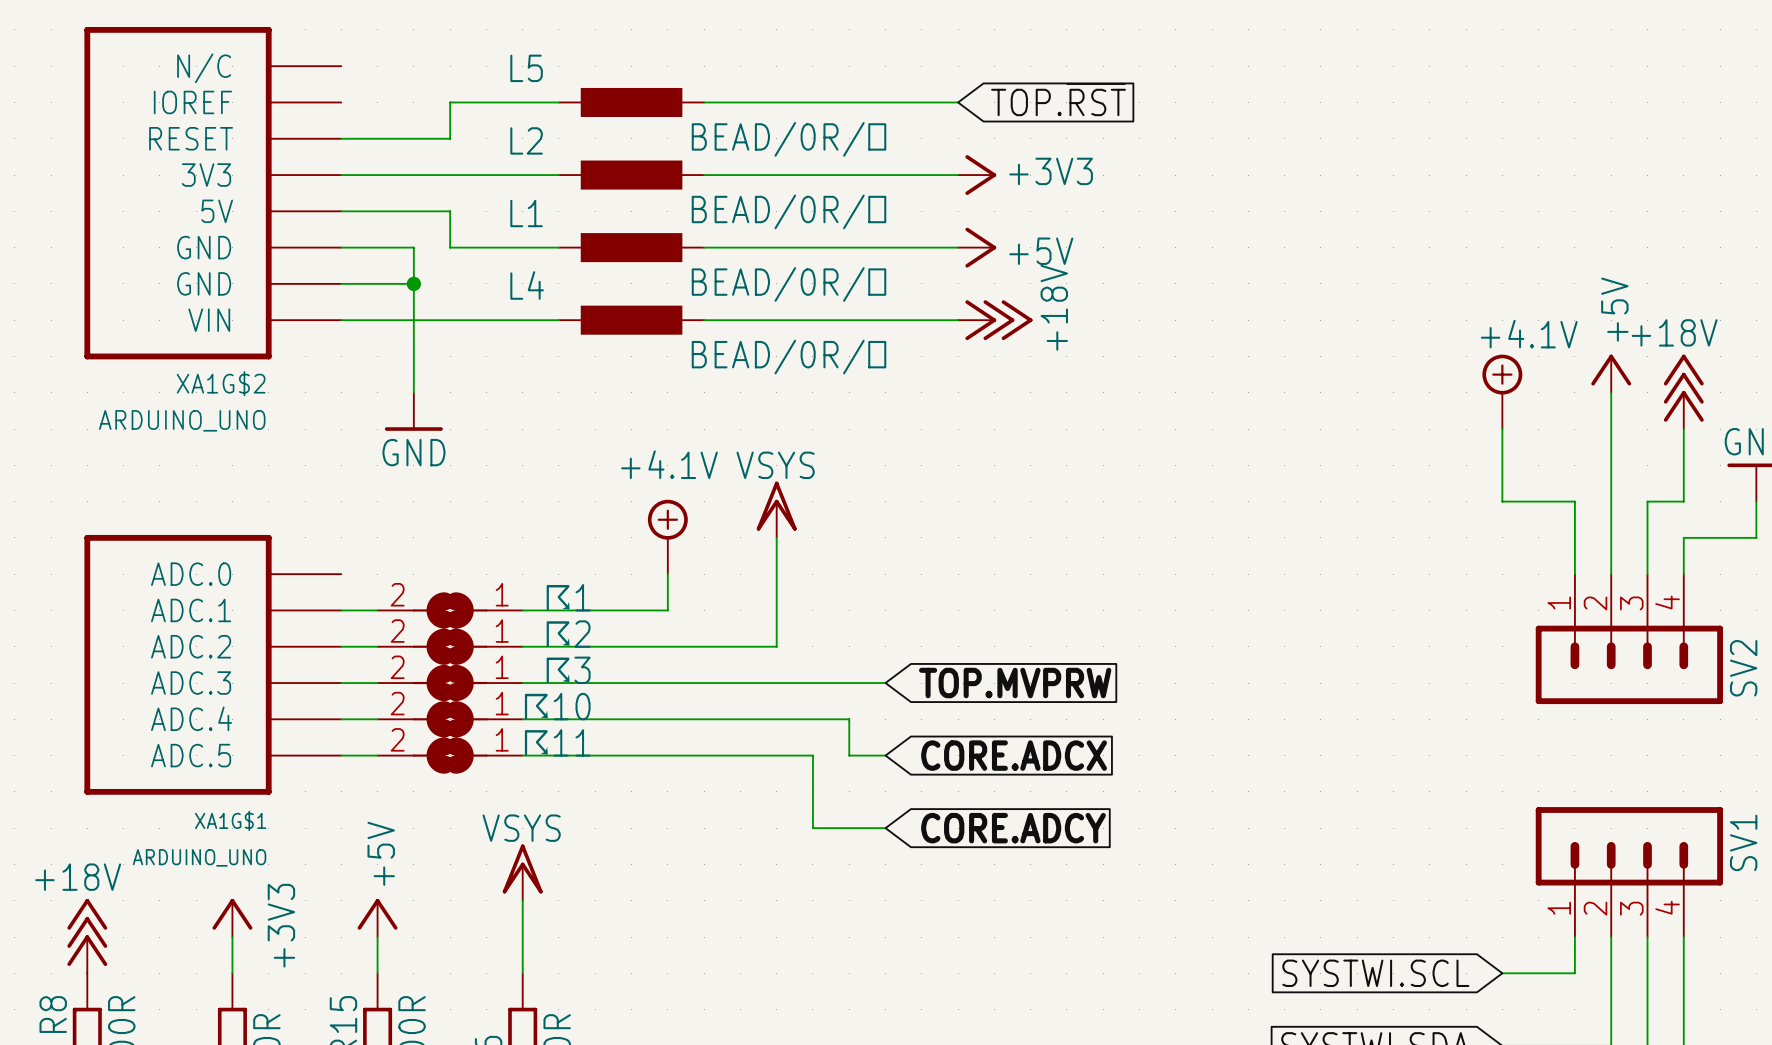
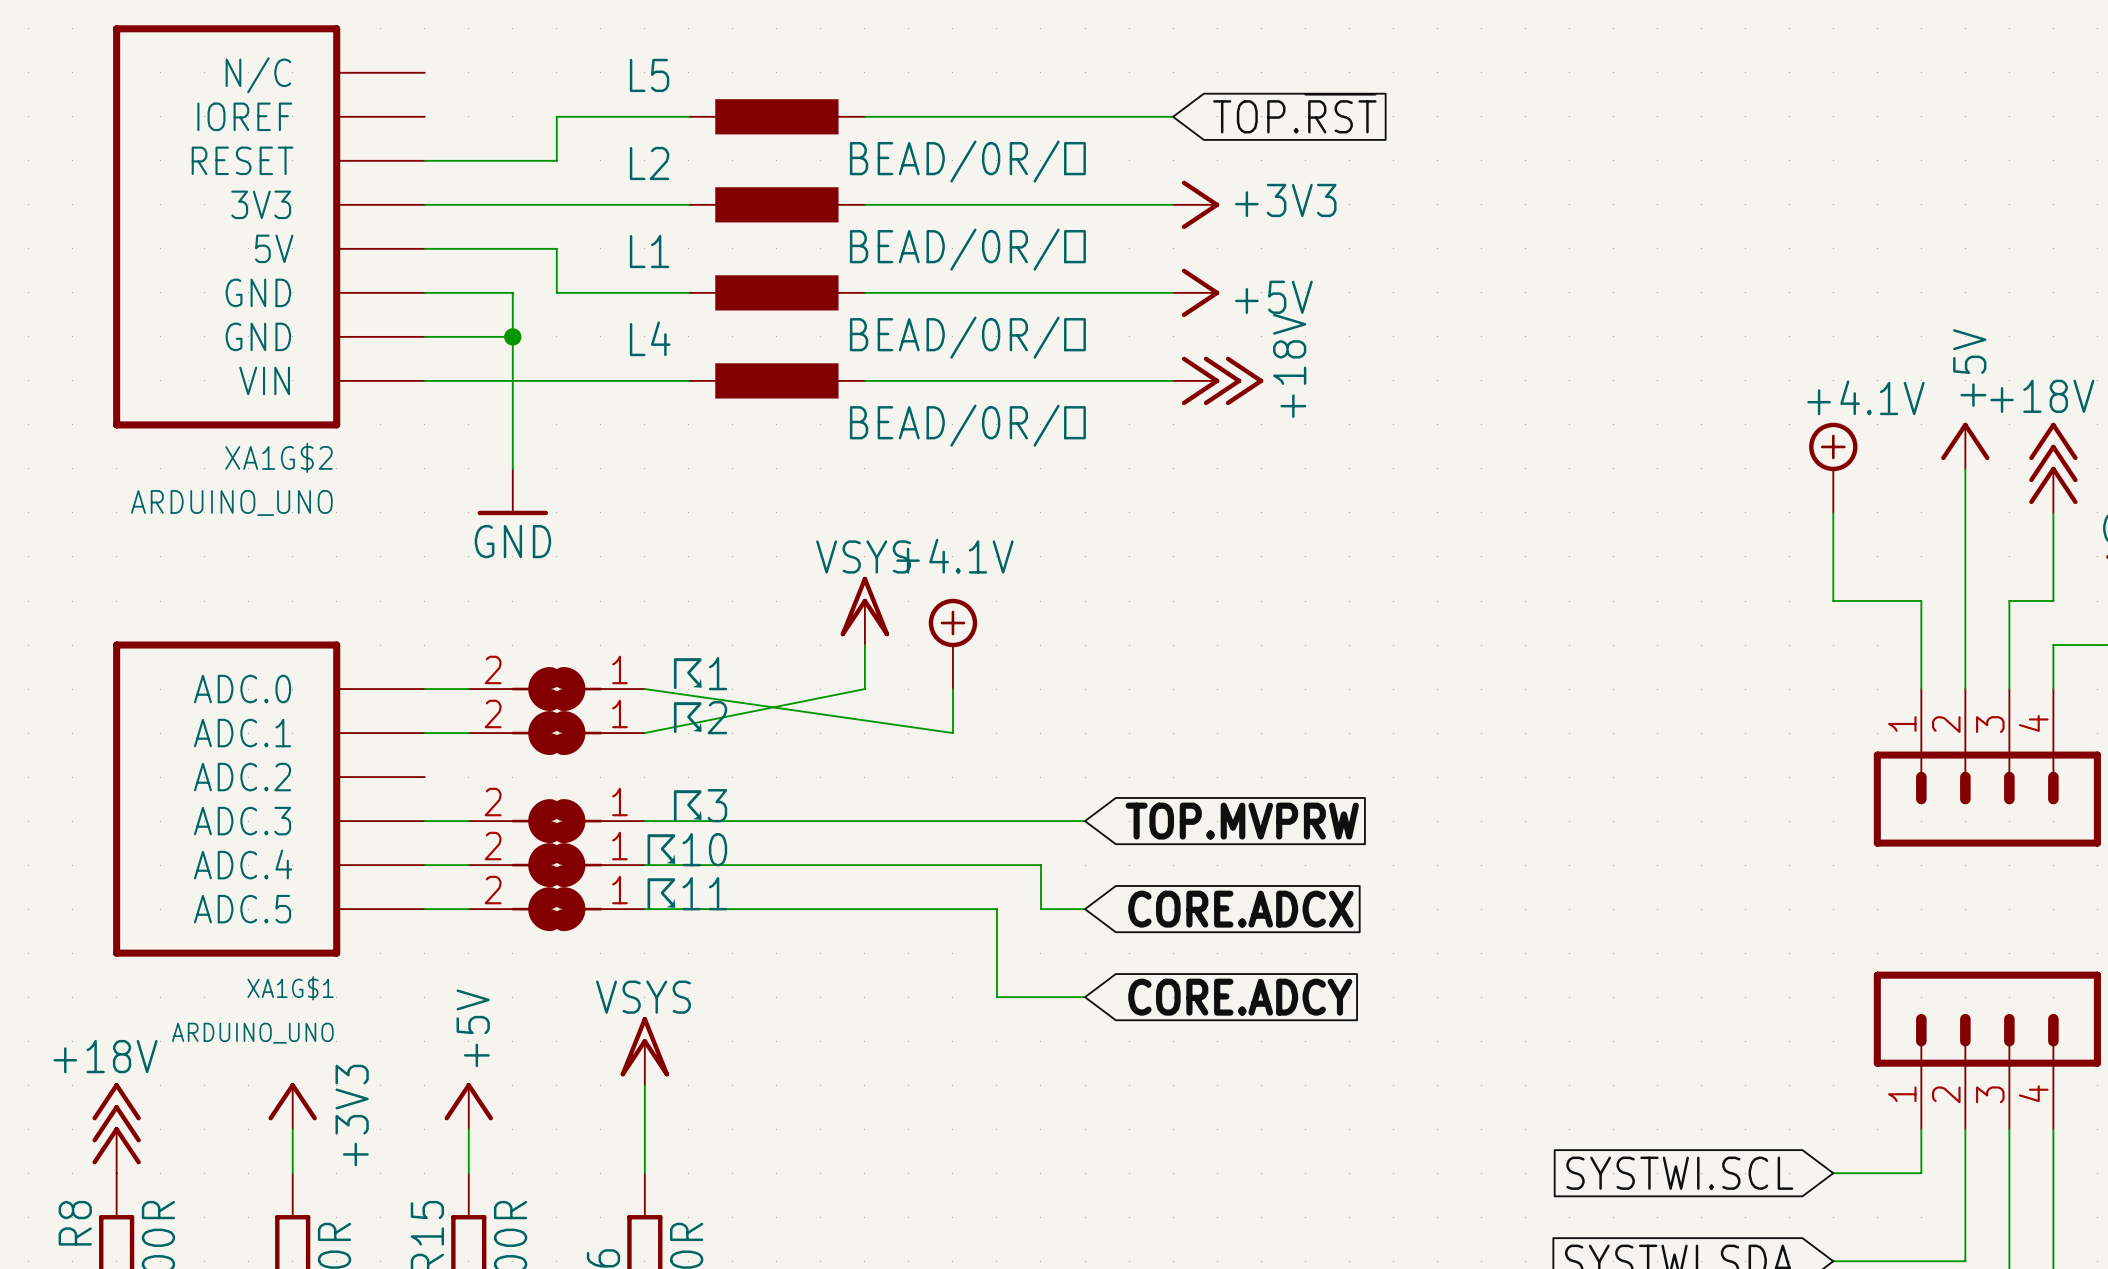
power symbol position: VSYS (776, 509) -> VSYS (864, 610)
power symbol position: +4.1V (667, 536) -> +4.1V (952, 643)
☈1: none -> (556, 689)
wire: (667, 574) (667, 610) (522, 610) -> (864, 645) (864, 689) (644, 733)
☈1 name: ☈1 (568, 597) -> ☈2 (699, 717)
wire: (776, 610) (776, 646) (522, 646) -> (952, 733) (644, 689)
wire: (341, 646) (377, 646) -> (424, 689) (468, 689)
☈2: (450, 646) -> none

